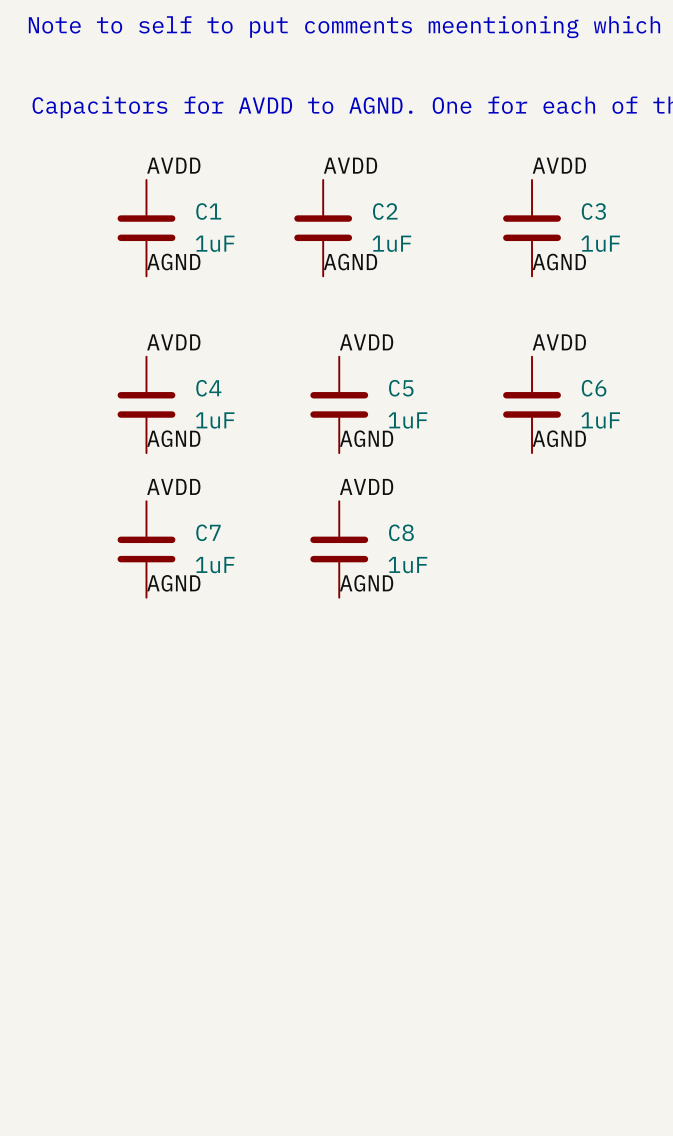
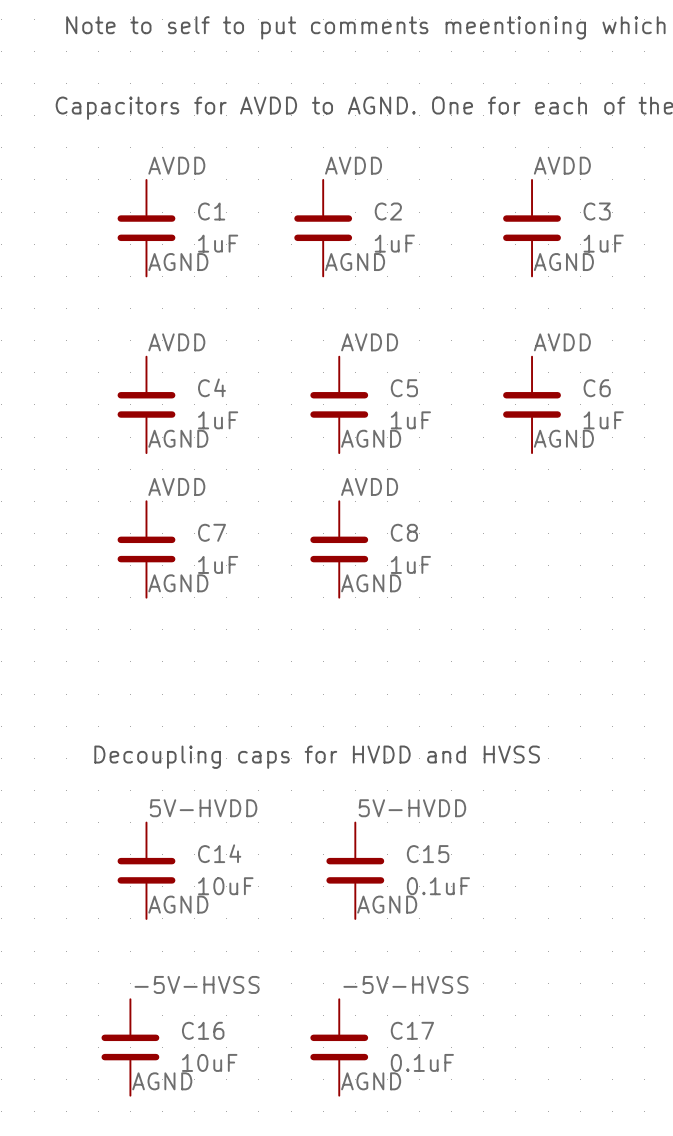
text: none -> Decoupling caps for HVDD and HVSS (317, 757)
label: none -> 5V-HVDD (203, 808)
label: none -> 5V-HVDD (412, 808)
C14: none -> 10uF (146, 870)
C15: none -> 0.1uF (355, 870)
label: none -> AGND (178, 904)
label: none -> AGND (387, 904)
label: none -> -5V-HVSS (197, 984)
label: none -> -5V-HVSS (405, 984)
C16: none -> 10uF (130, 1047)
C17: none -> 0.1uF (339, 1047)
label: none -> AGND (162, 1081)
label: none -> AGND (371, 1081)

